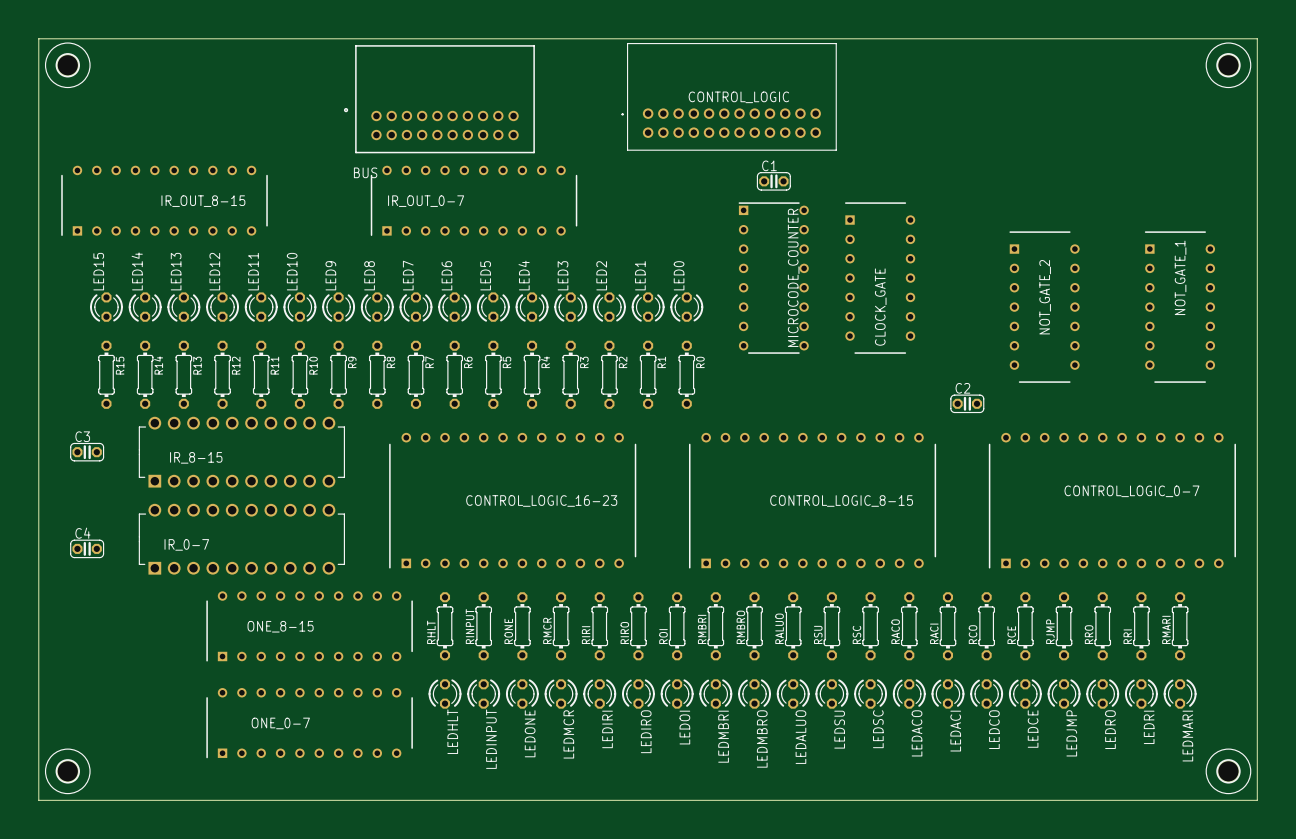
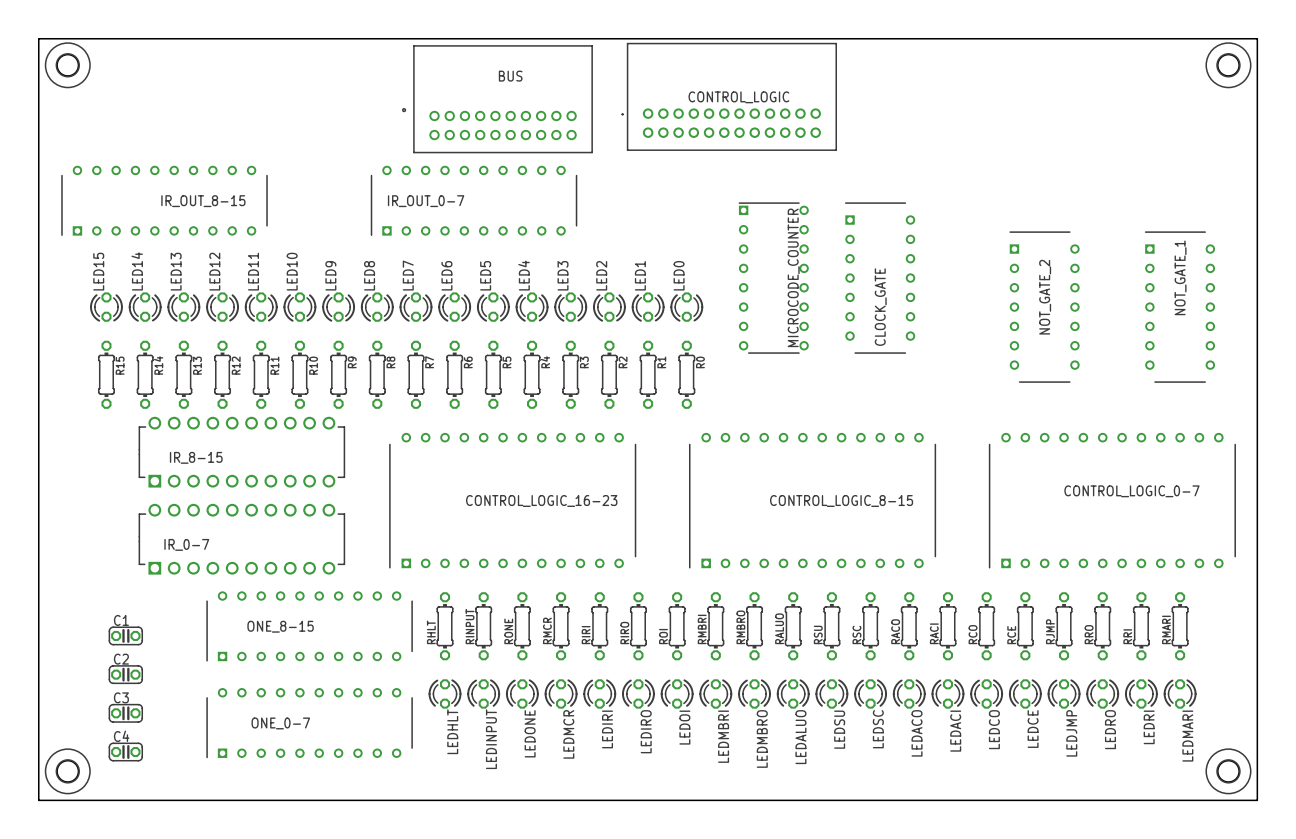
BUS position: (439, 99) -> (497, 99)
BUS name position: BUS (365, 172) -> BUS (510, 76)
C1 position: (773, 181) -> (125, 635)
C2 position: (967, 403) -> (125, 674)
C3 position: (87, 452) -> (125, 713)
C4 position: (87, 548) -> (125, 752)

